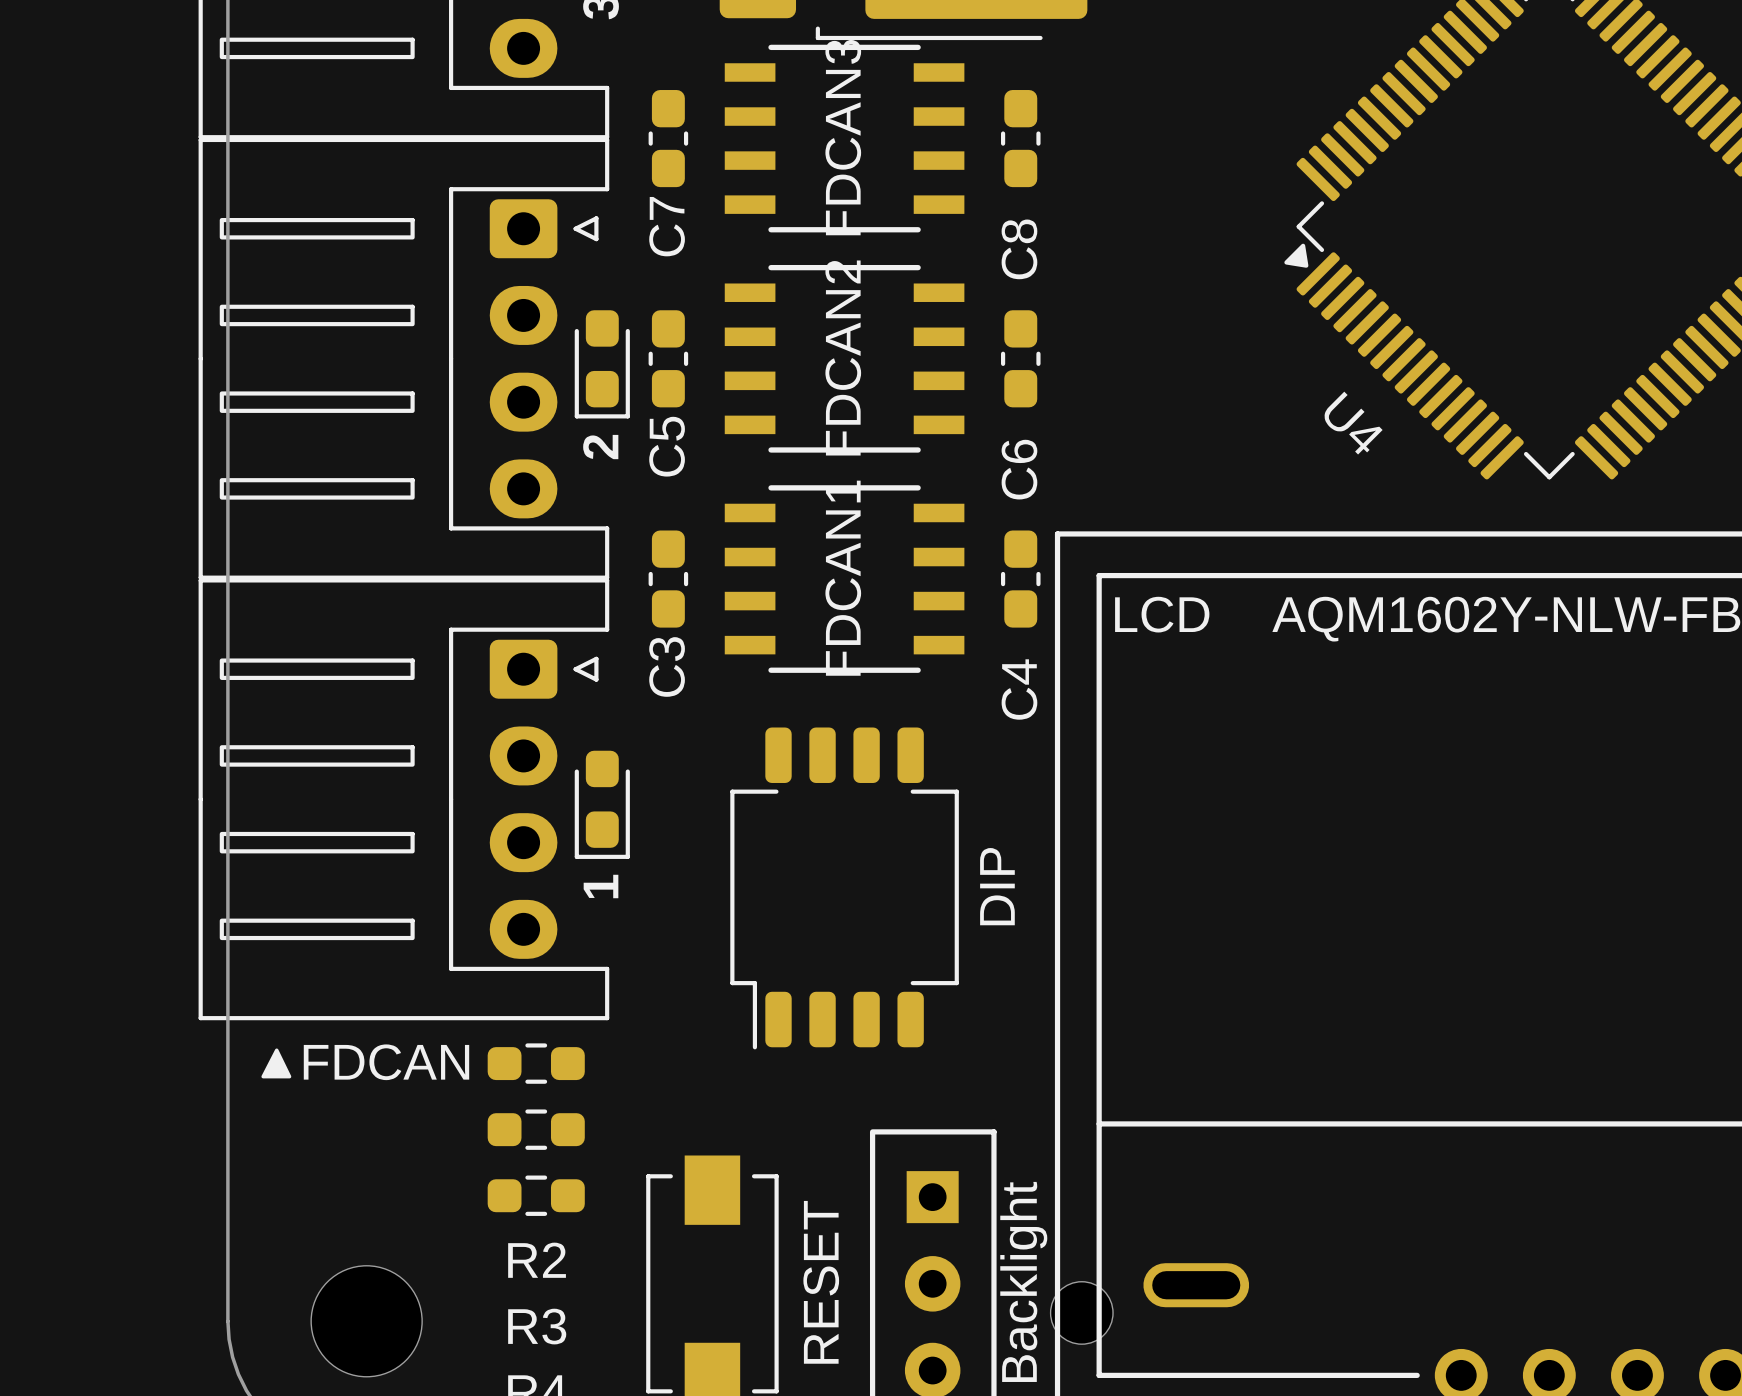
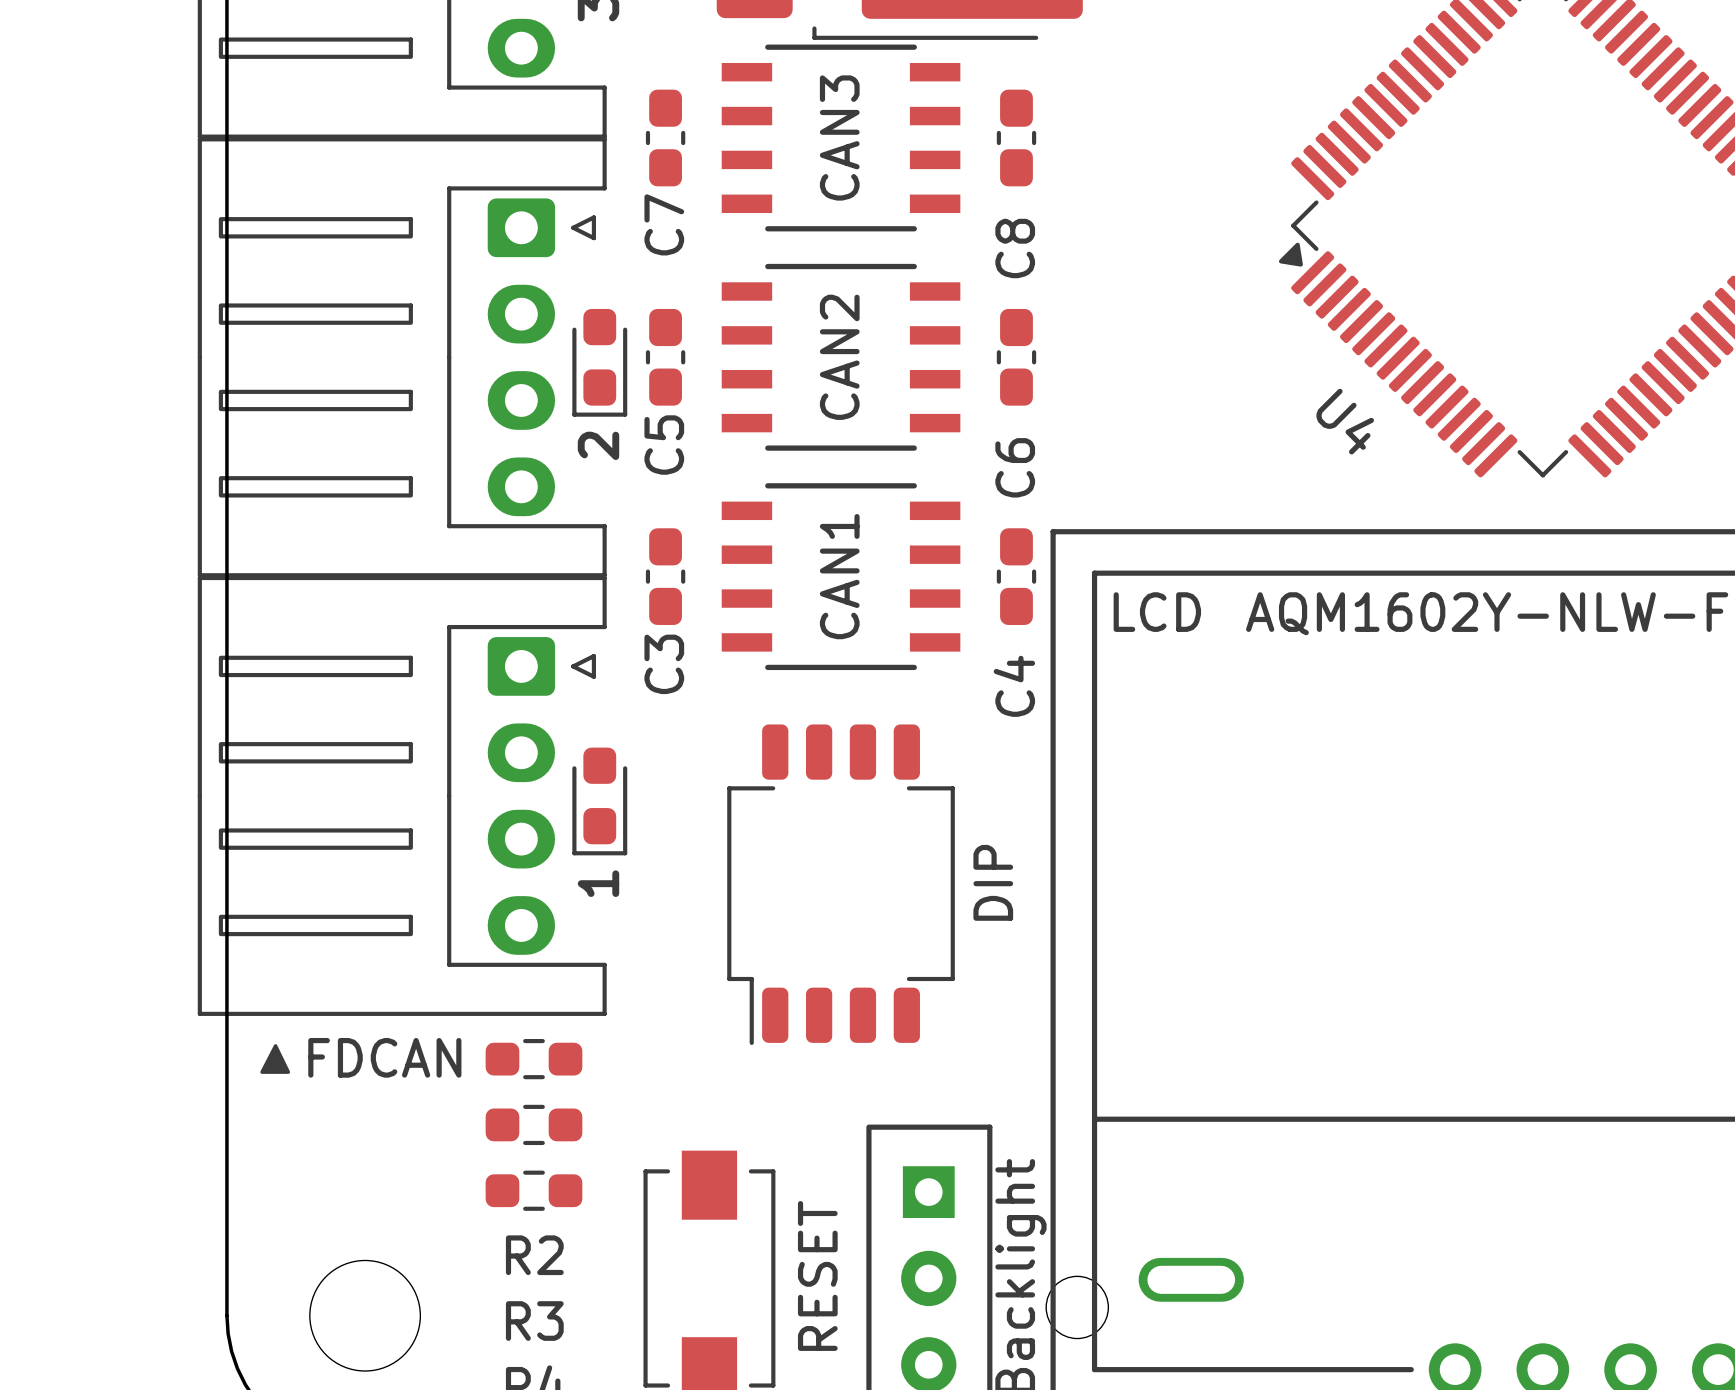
FDCAN3 name: FDCAN3 (843, 137) -> CAN3 (839, 137)
FDCAN2 name: FDCAN2 (843, 358) -> CAN2 (839, 357)
FDCAN1 name: FDCAN1 (843, 578) -> CAN1 (839, 576)

